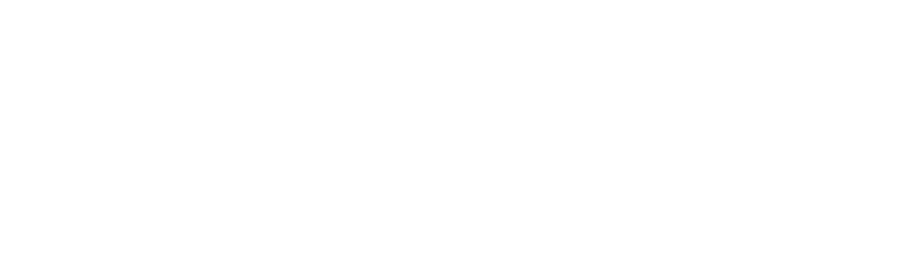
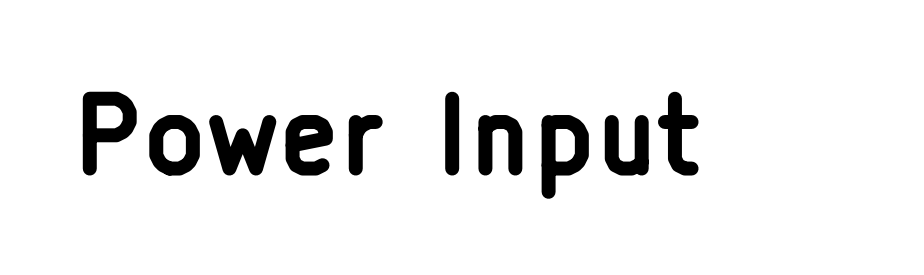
text: none -> Power Input (390, 145)

